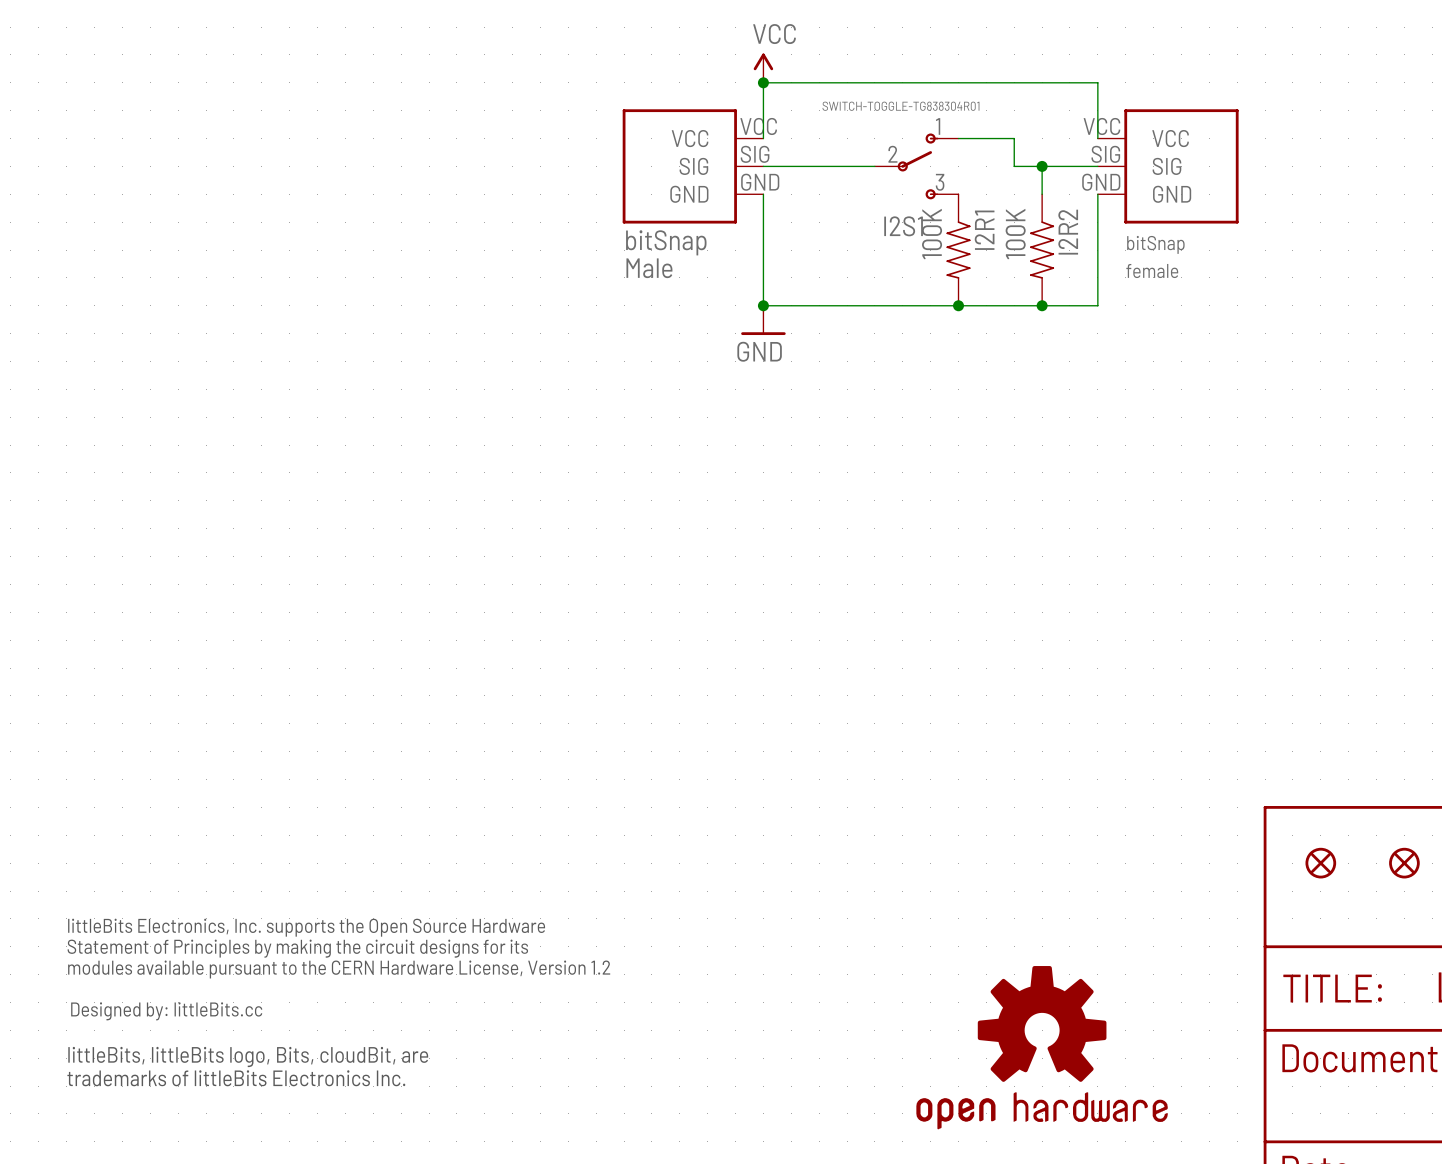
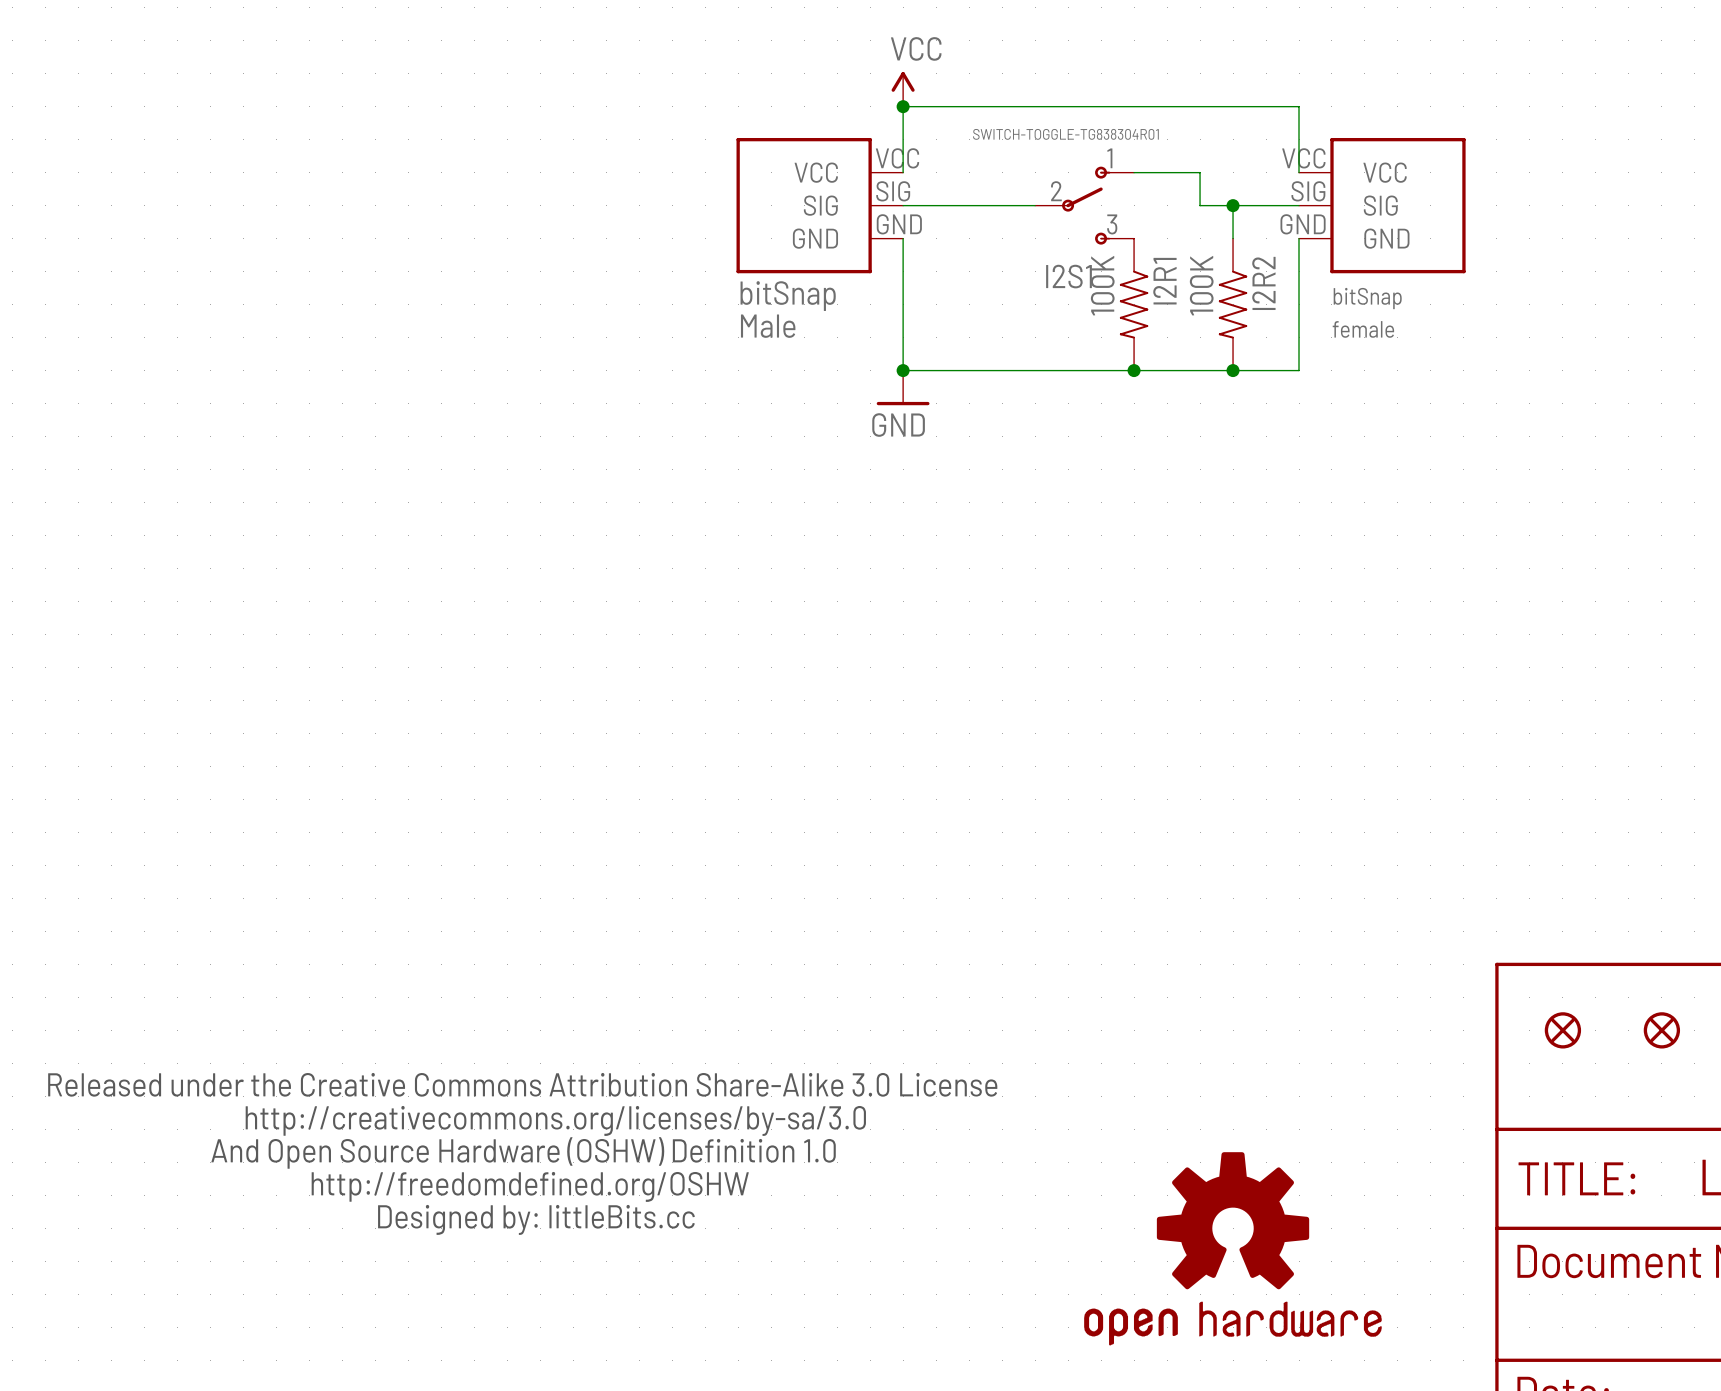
part: none -> (522, 1153)
part: (338, 1002) -> none

